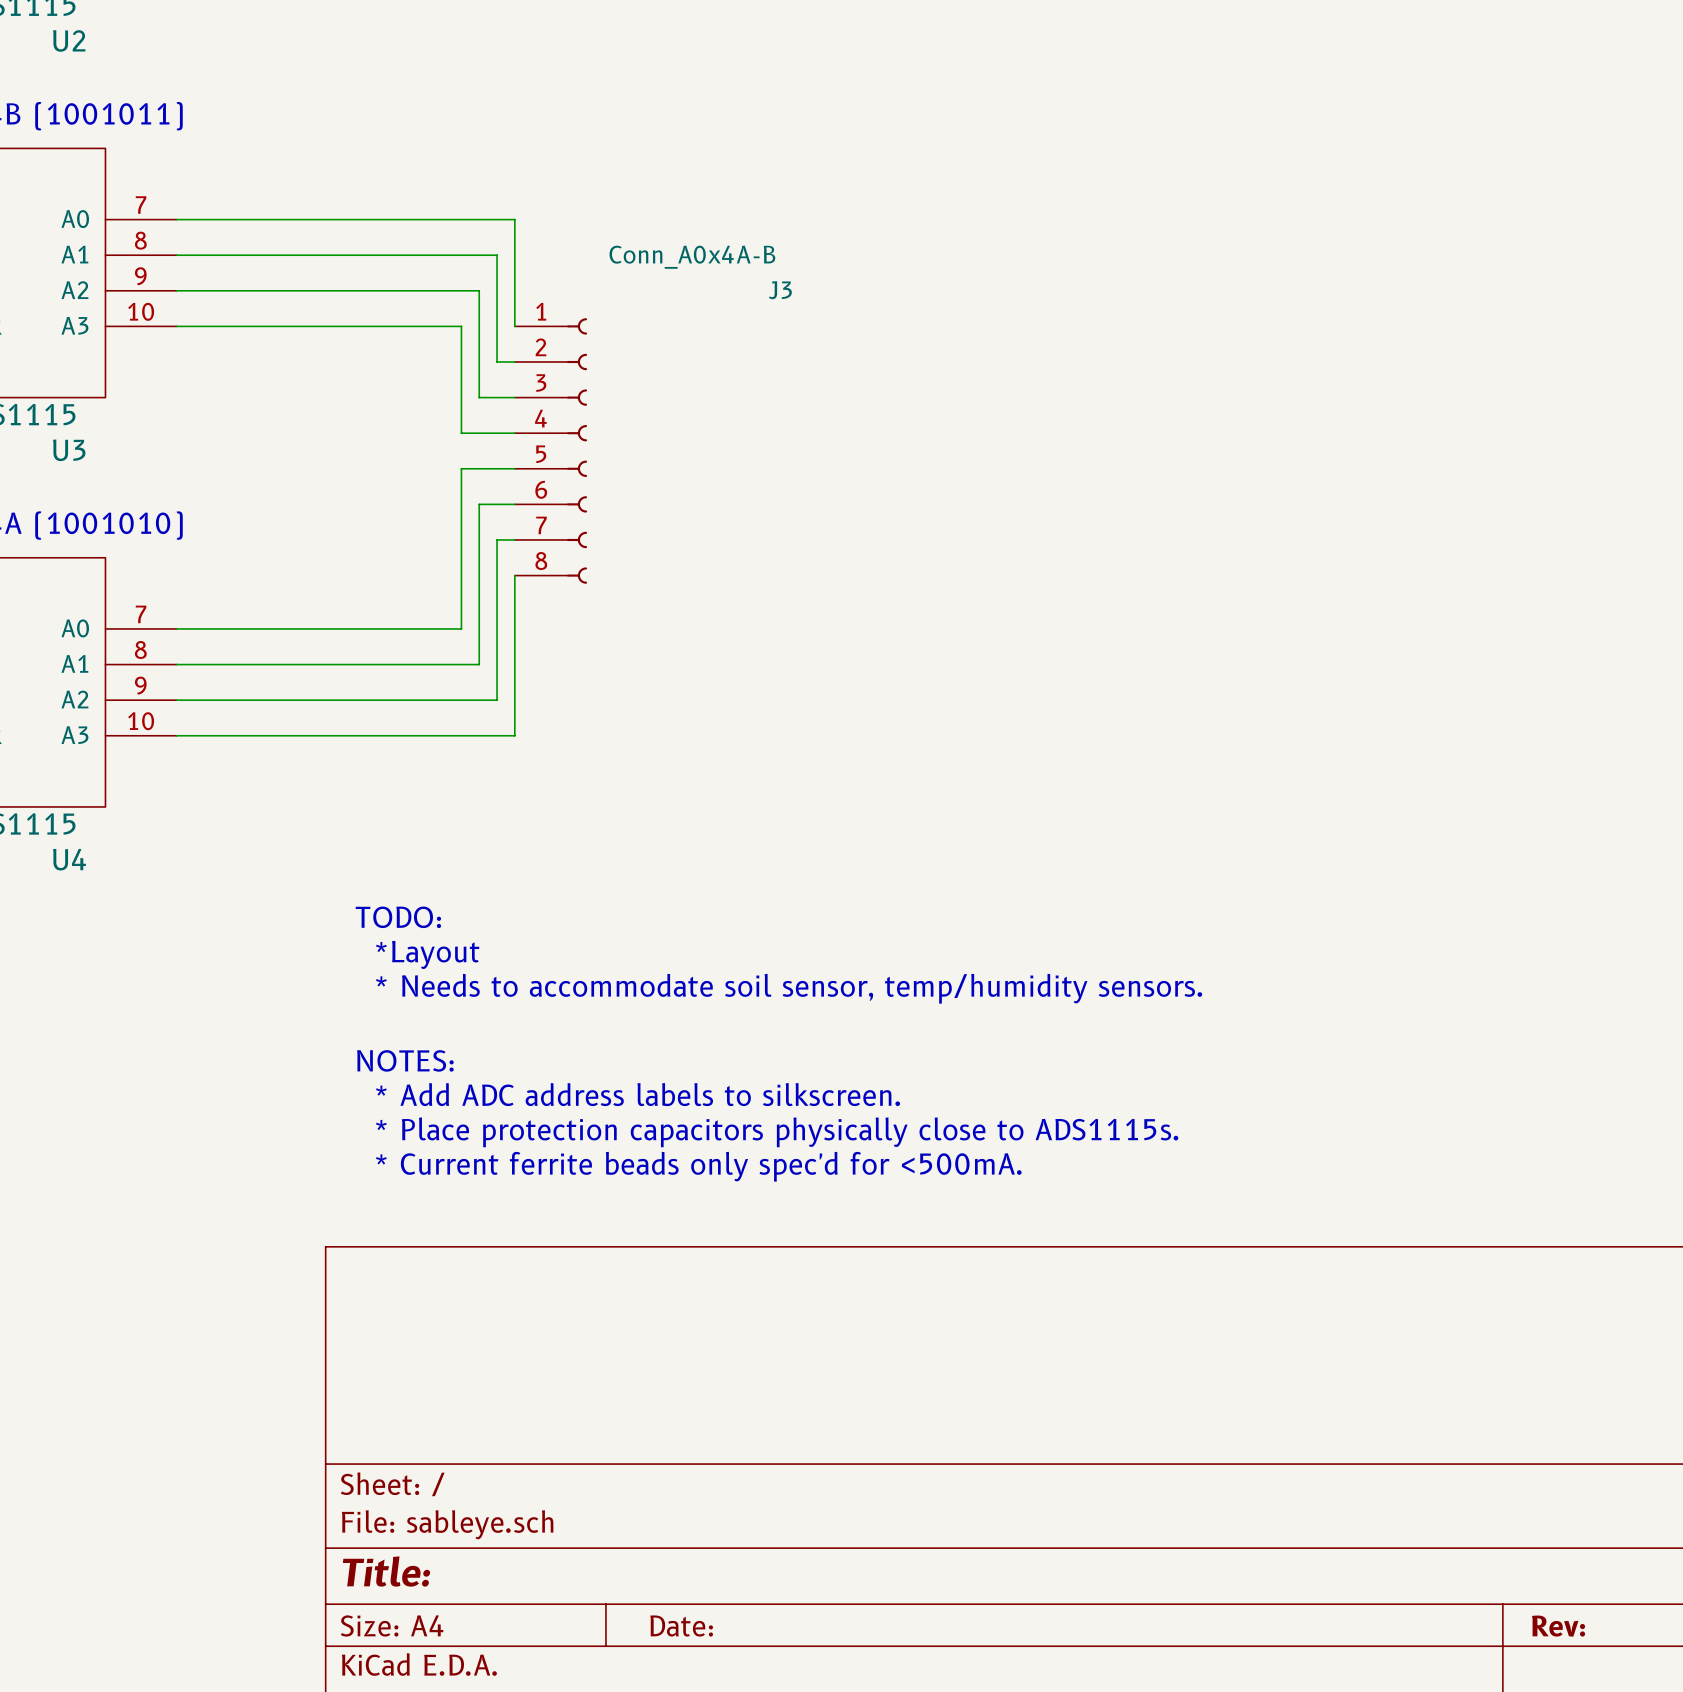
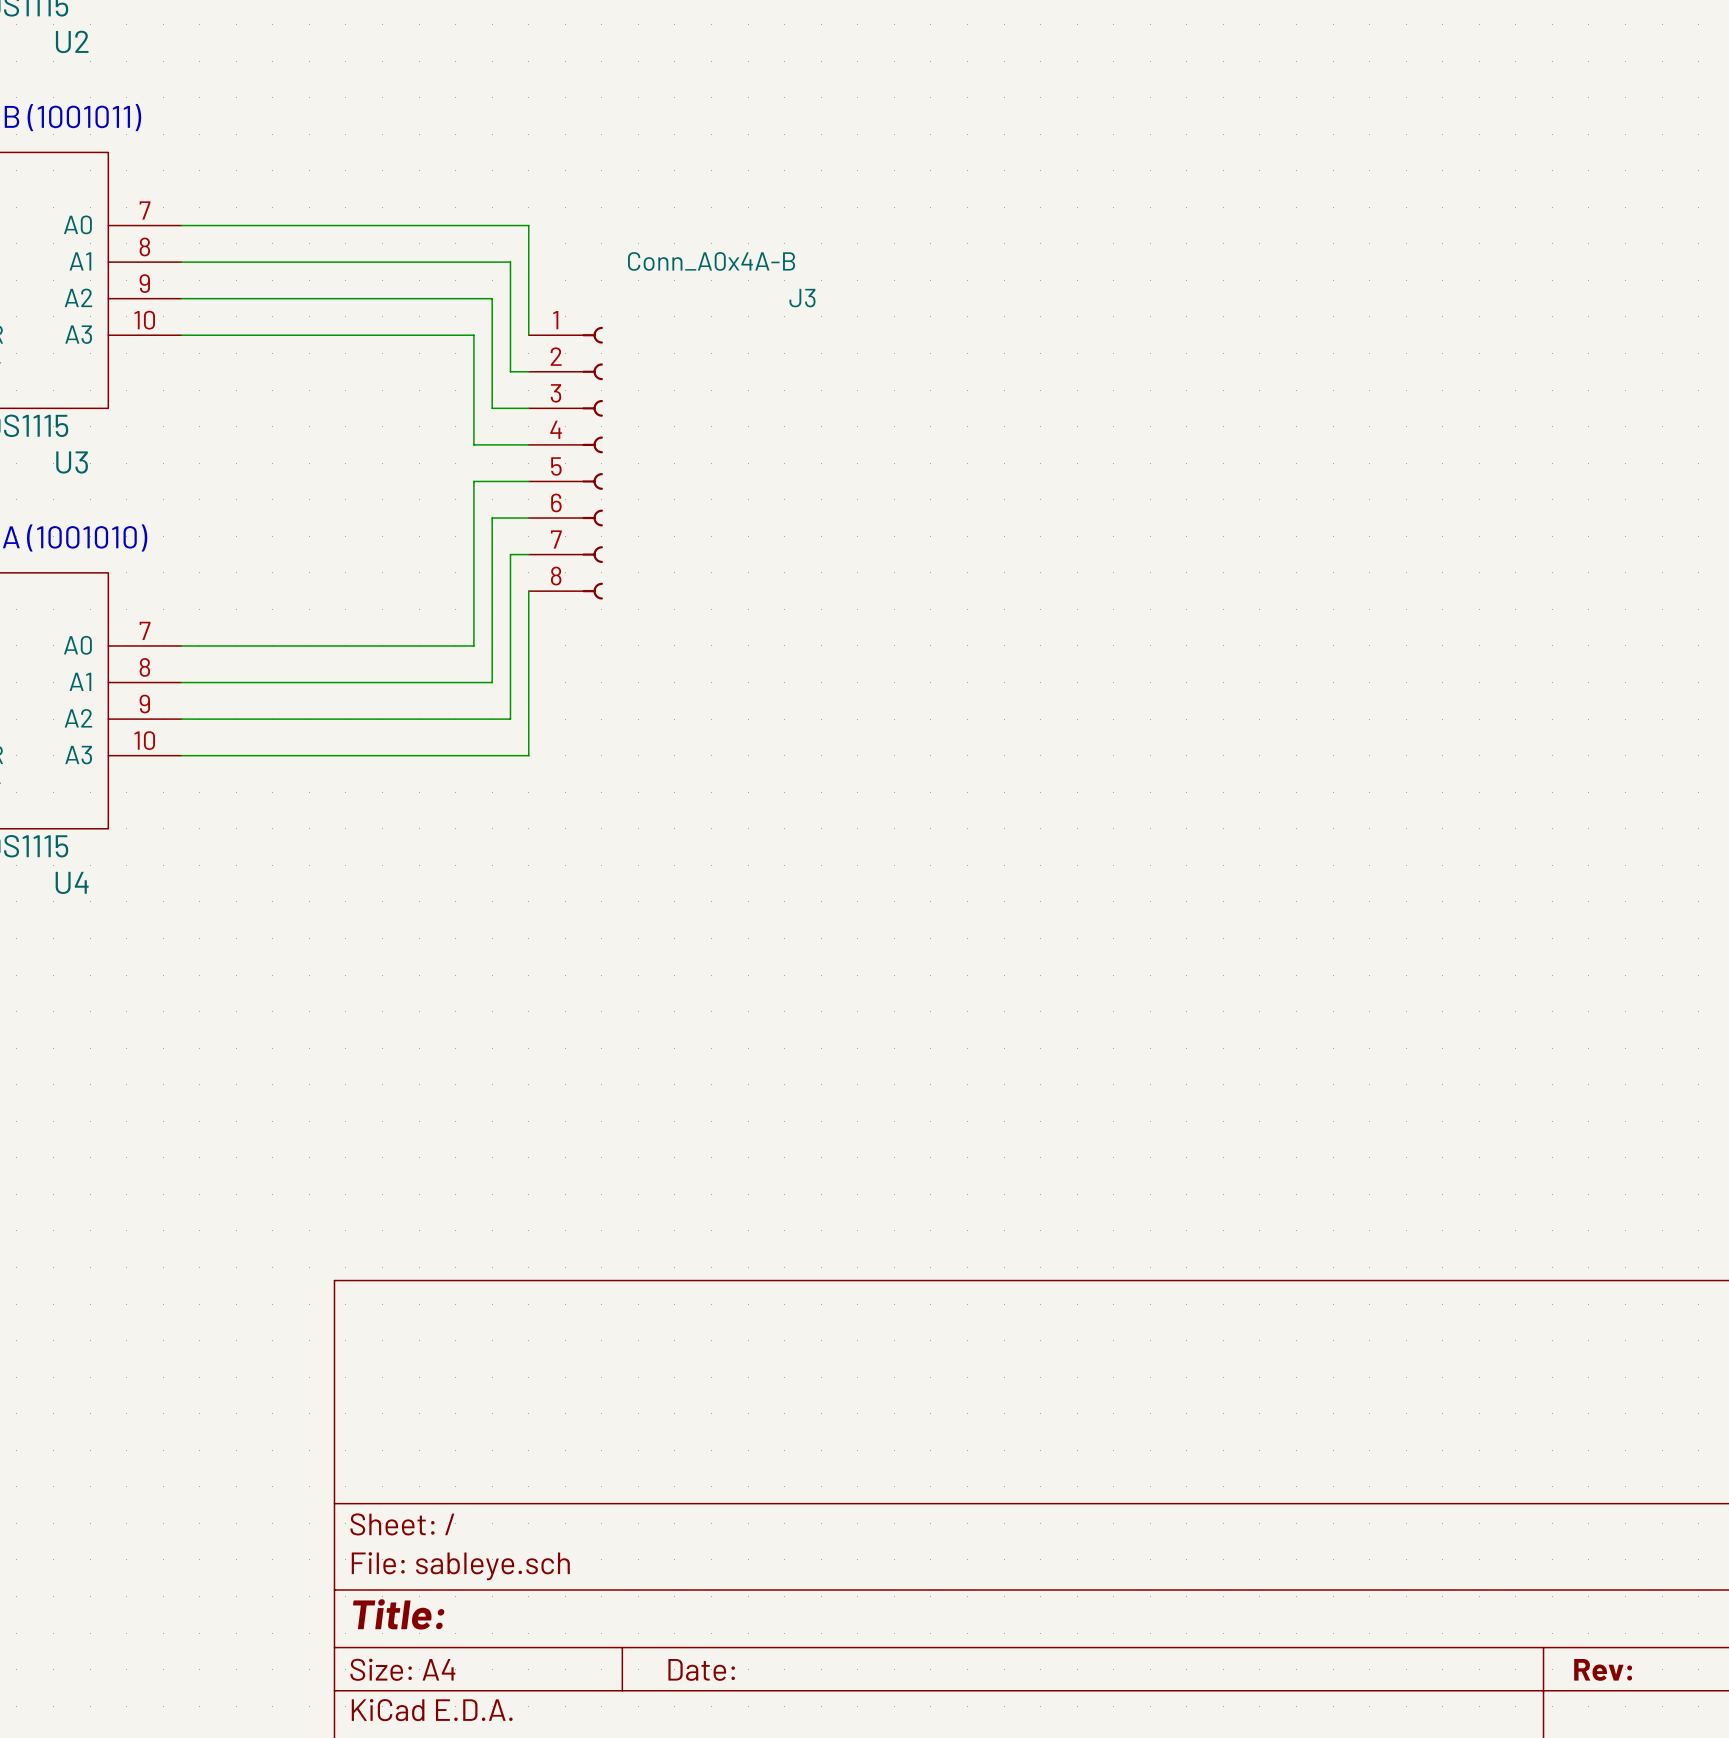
text: TODO: (398, 917) -> none
text: *Layout (427, 954) -> none
text: * Needs to accommodate soil sensor, temp/humidity sensors. (789, 988) -> none
text: NOTES: (405, 1060) -> none
text: * Add ADC address labels to silkscreen. (638, 1094) -> none
text: * Place protection capacitors physically close to ADS1115s. (777, 1132) -> none
text: * Current ferrite beads only spec'd for <500mA. (698, 1166) -> none

